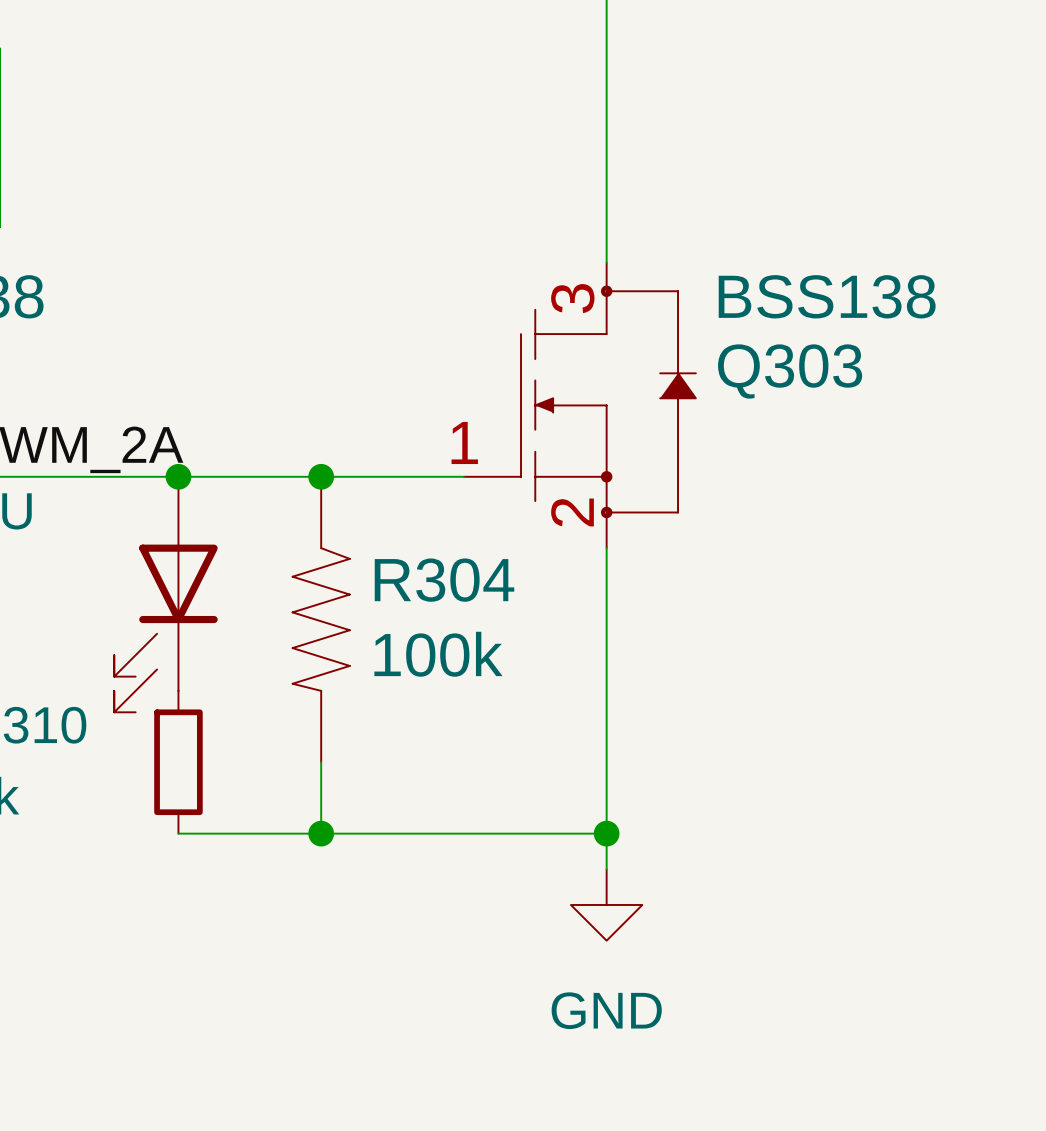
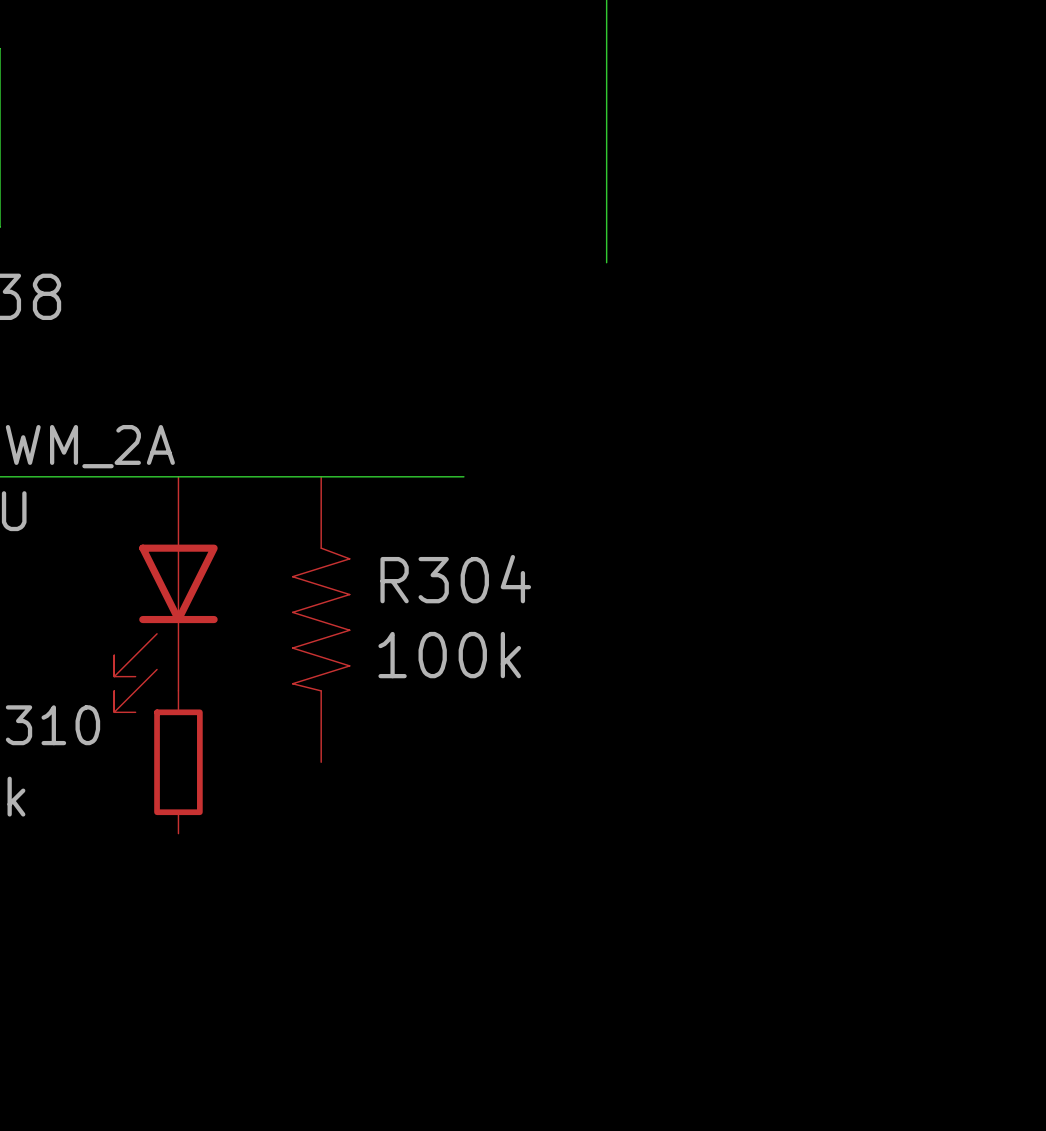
Q303: BSS138 (579, 405) -> none
junction: (178, 476) -> none
junction: (321, 476) -> none
wire: (606, 548) (606, 869) -> none
wire: (321, 762) (321, 833) -> none
wire: (178, 833) (606, 833) -> none
junction: (321, 833) -> none
junction: (606, 833) -> none
power symbol: GND (606, 904) -> none

